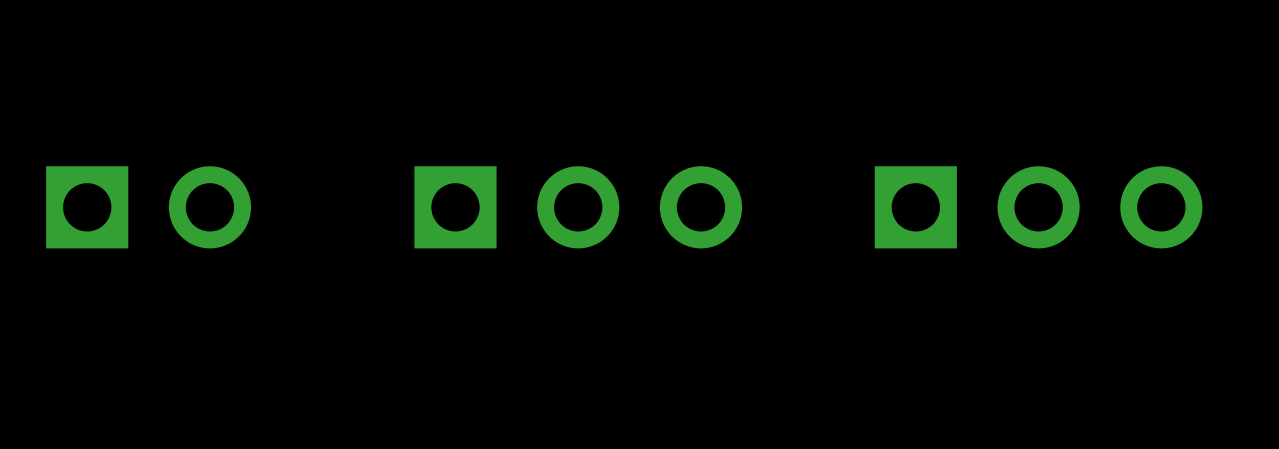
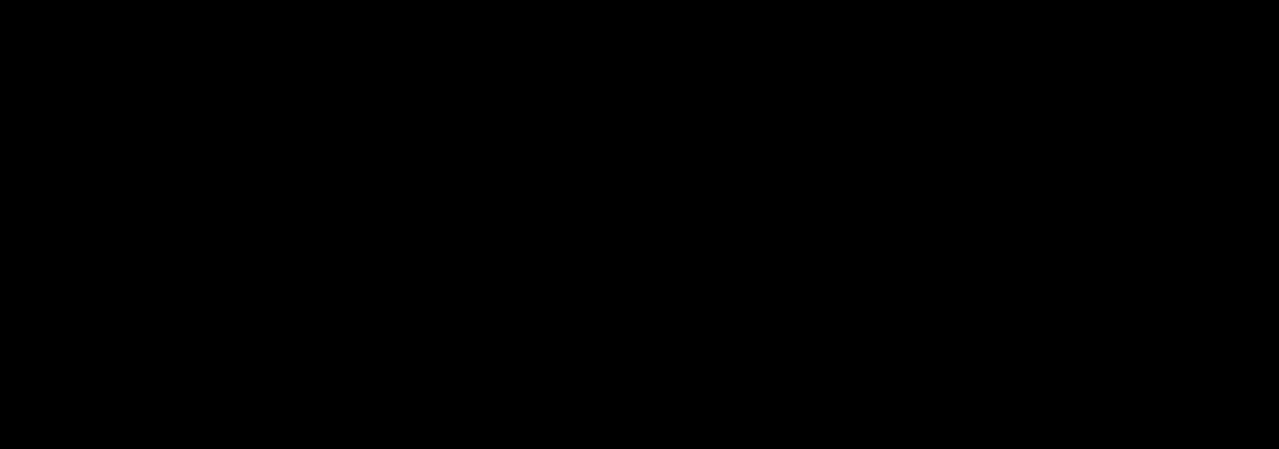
part: (148, 207) -> none
part: (578, 207) -> none
part: (1038, 207) -> none

